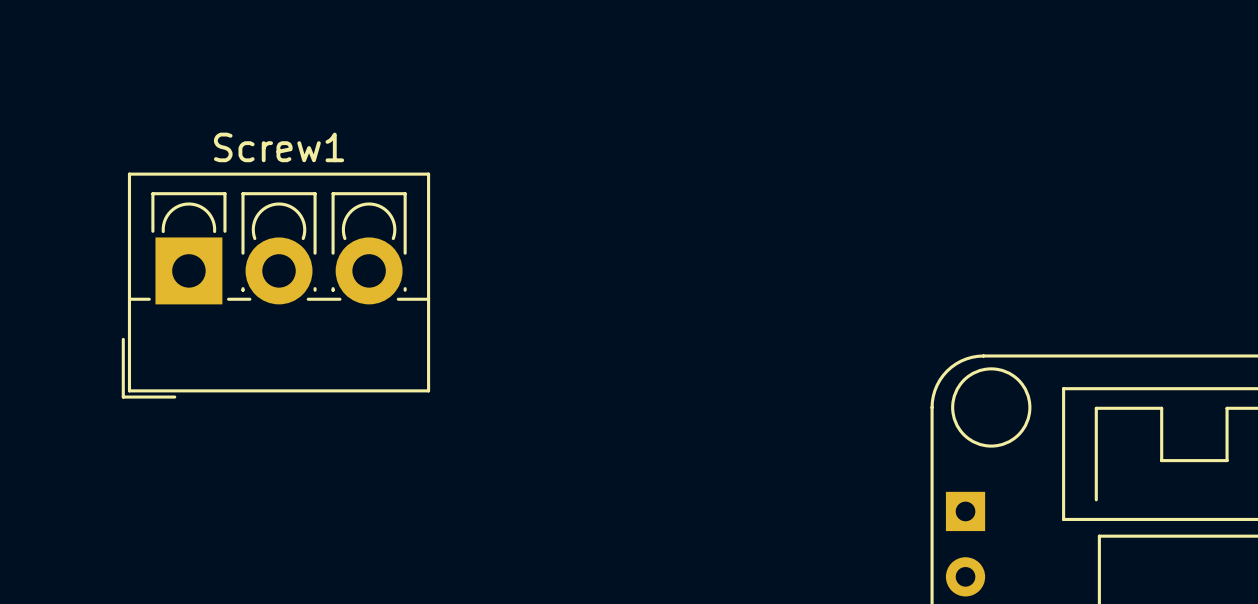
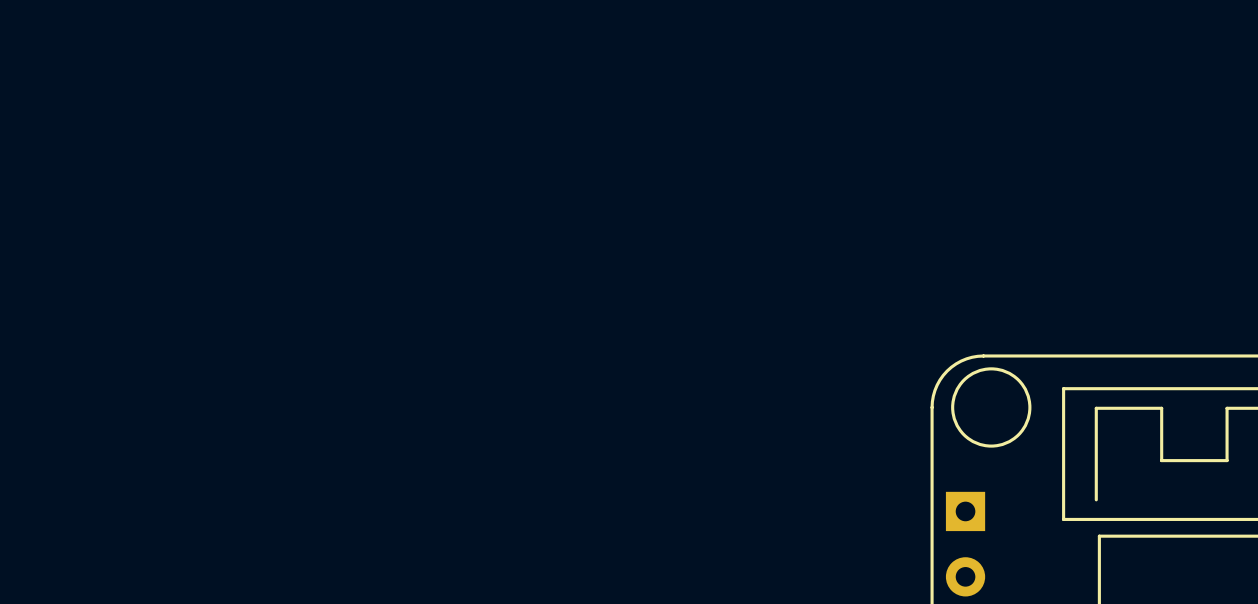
Screw1: (275, 285) -> none

